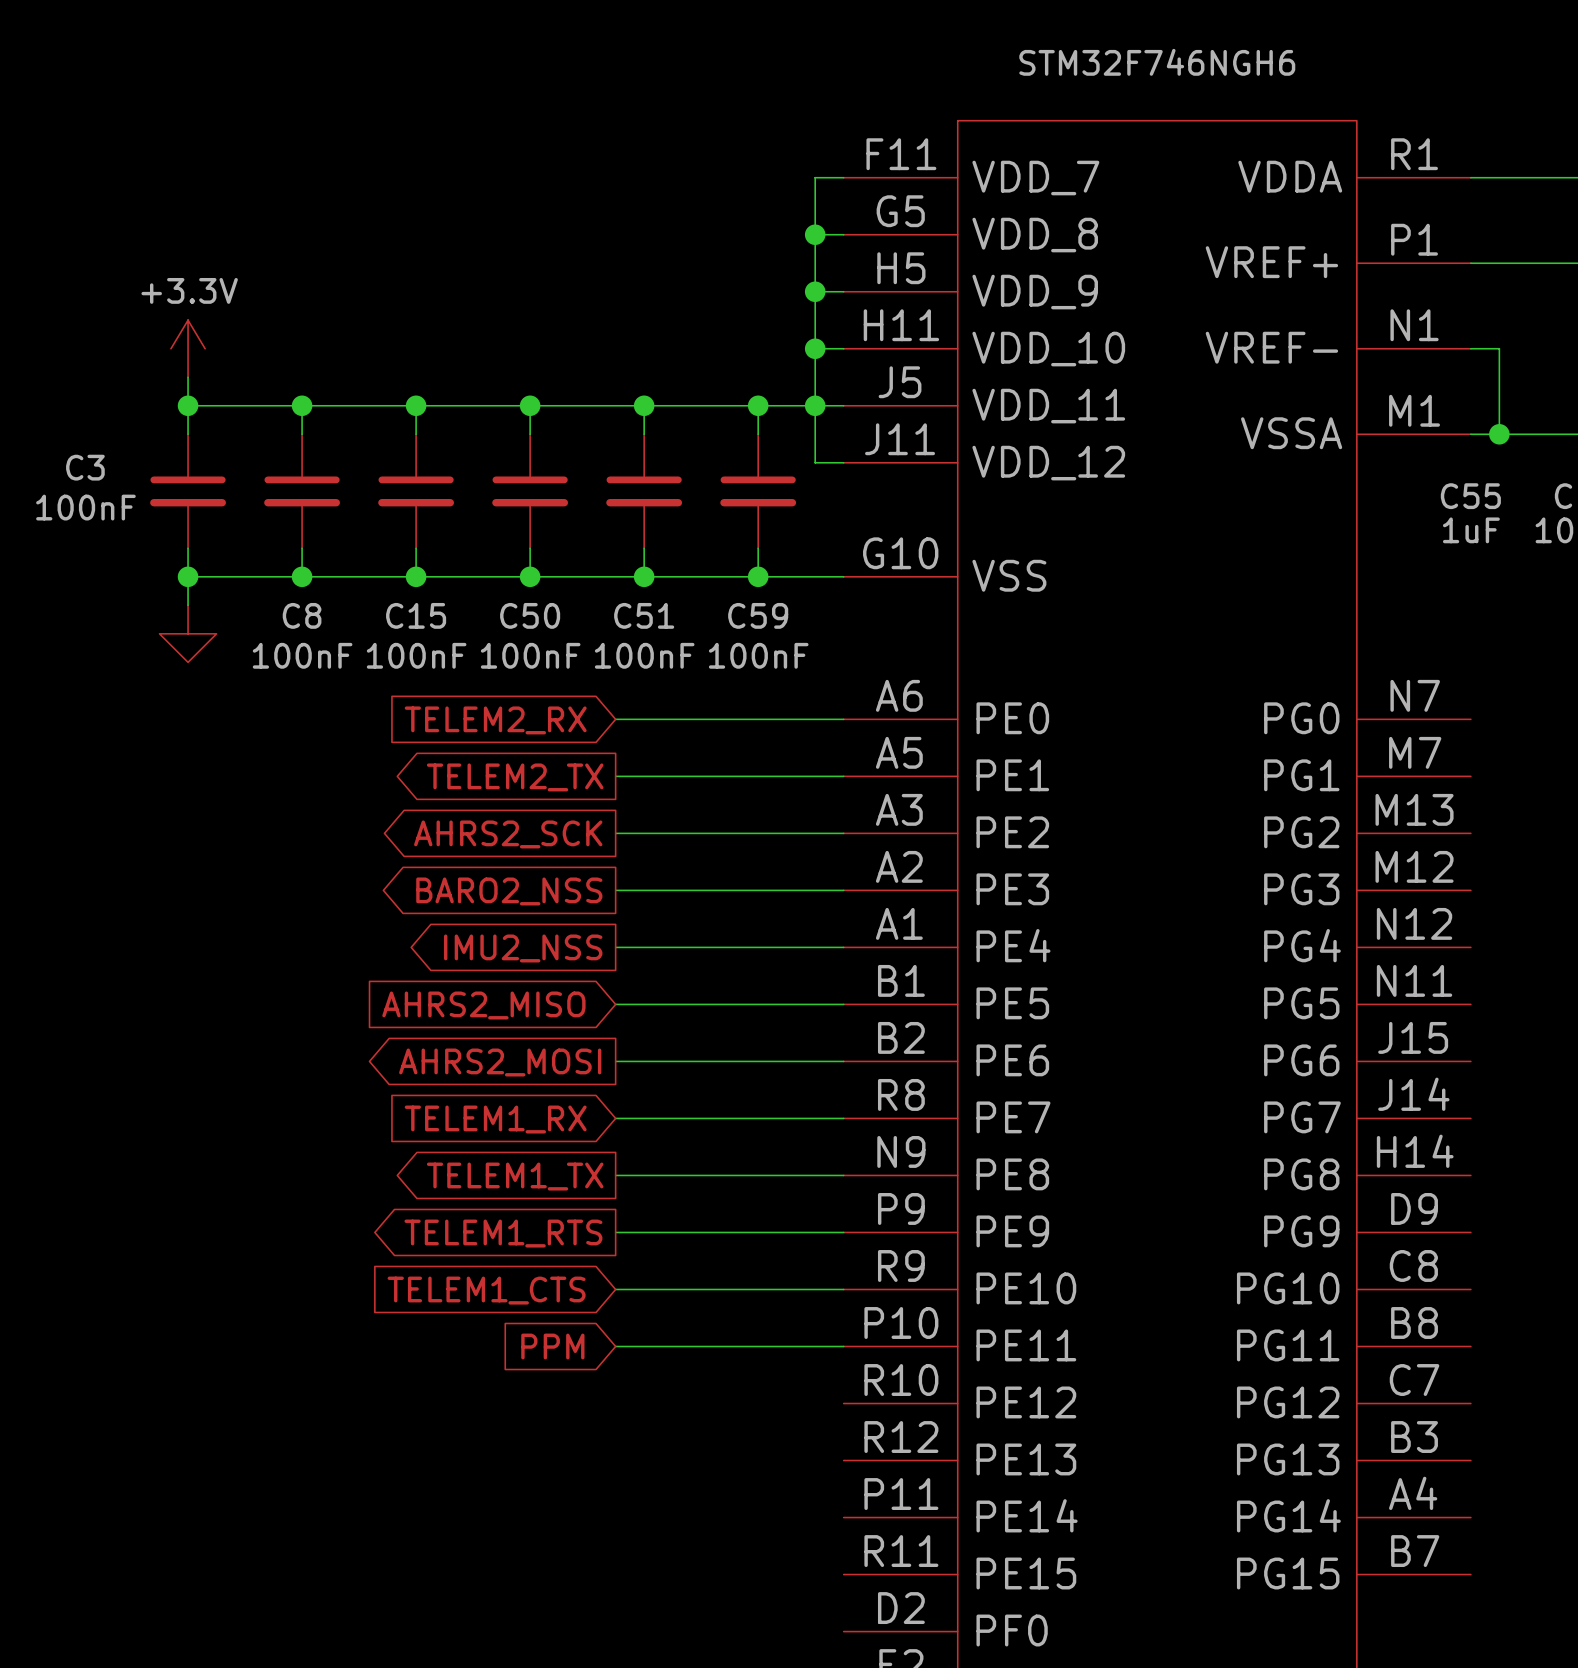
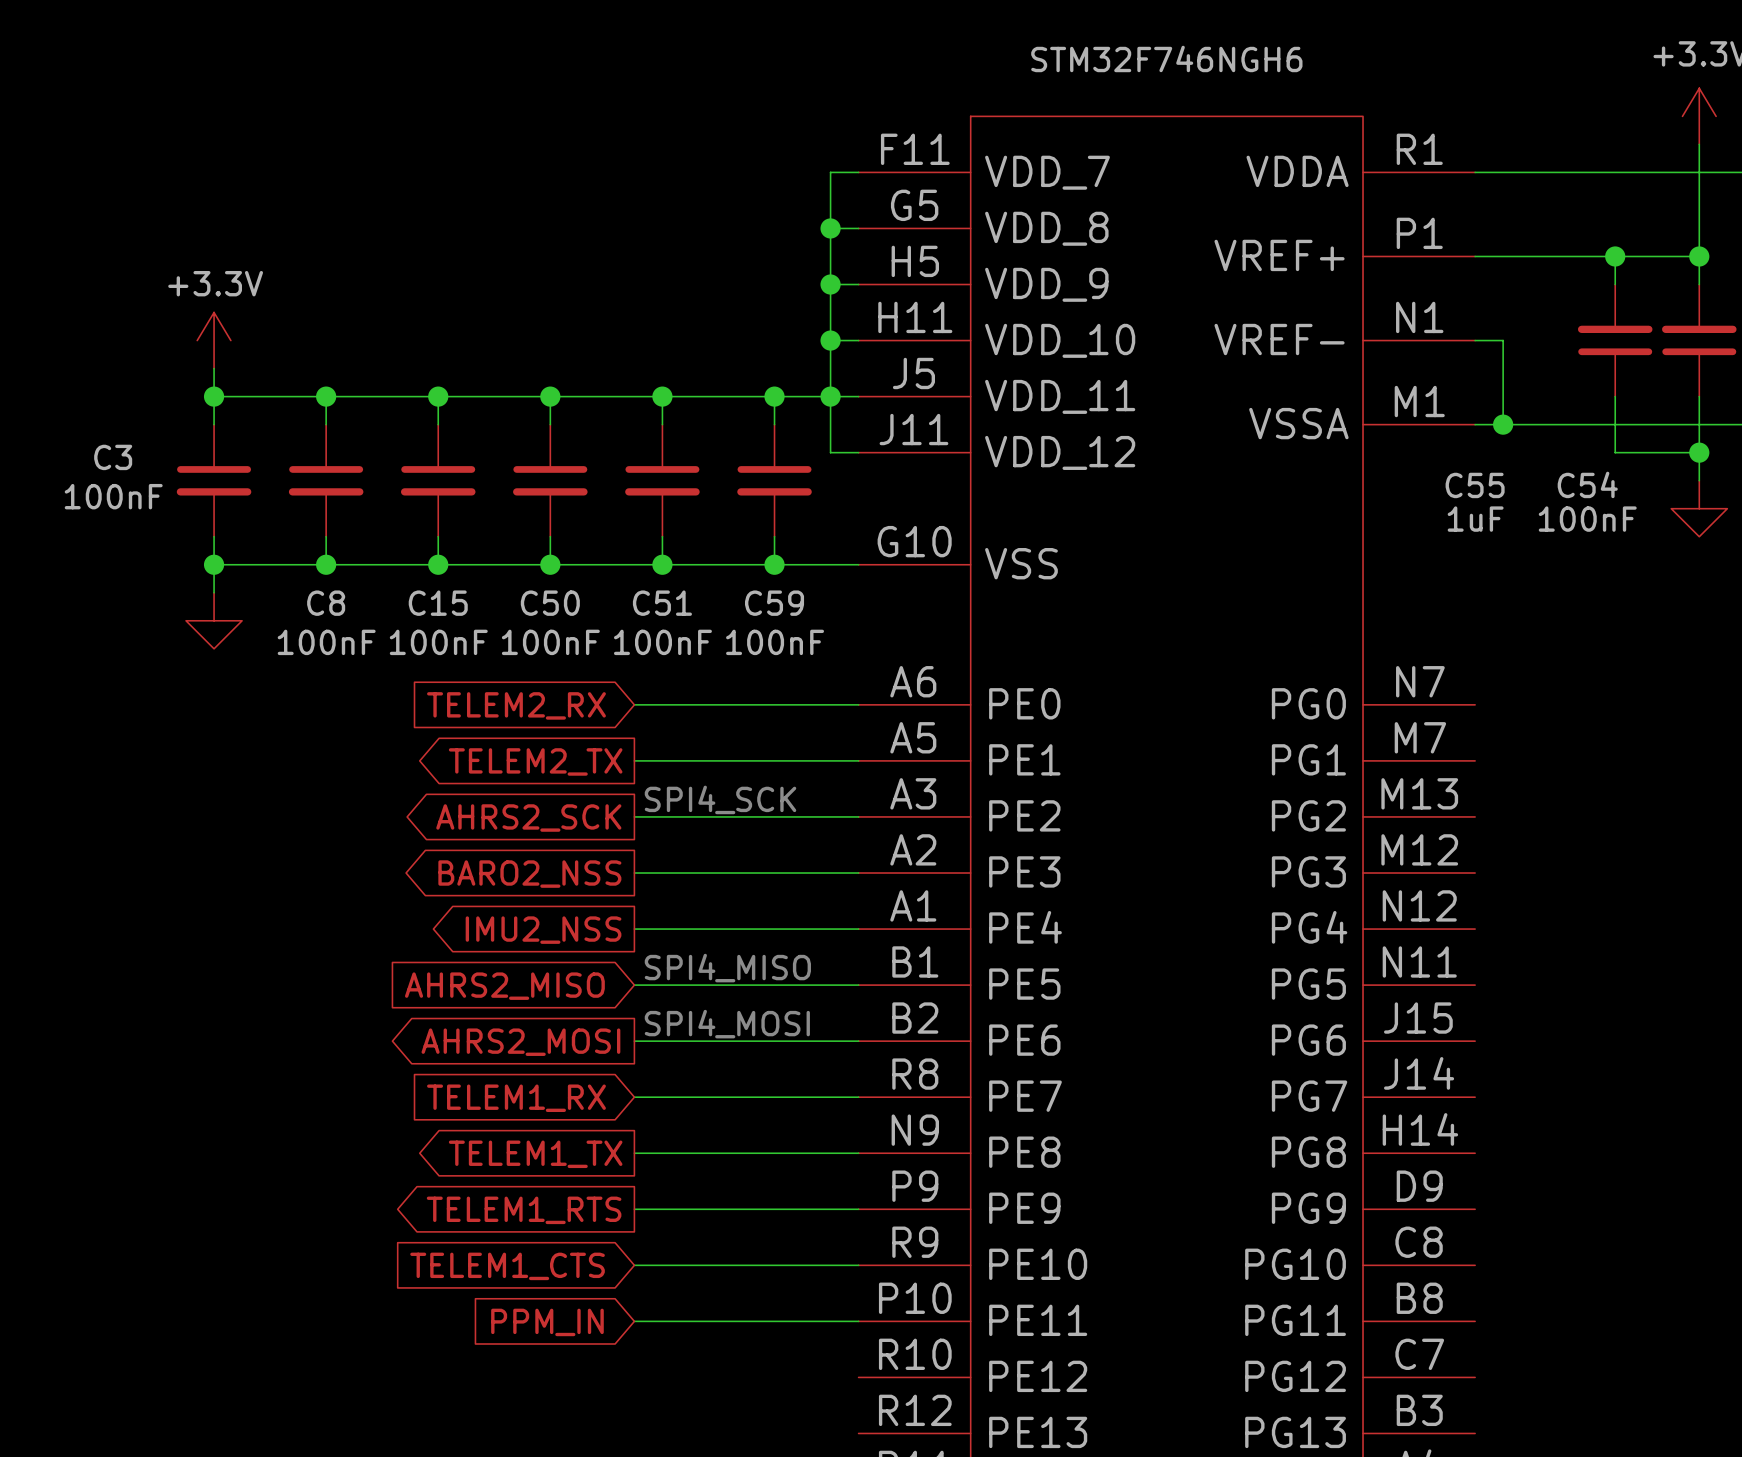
text: none -> SPI4_SCK (720, 799)
text: none -> SPI4_MISO (727, 968)
text: none -> SPI4_MOSI (727, 1024)
global label: PPM (552, 1346) -> PPM_IN (547, 1322)

